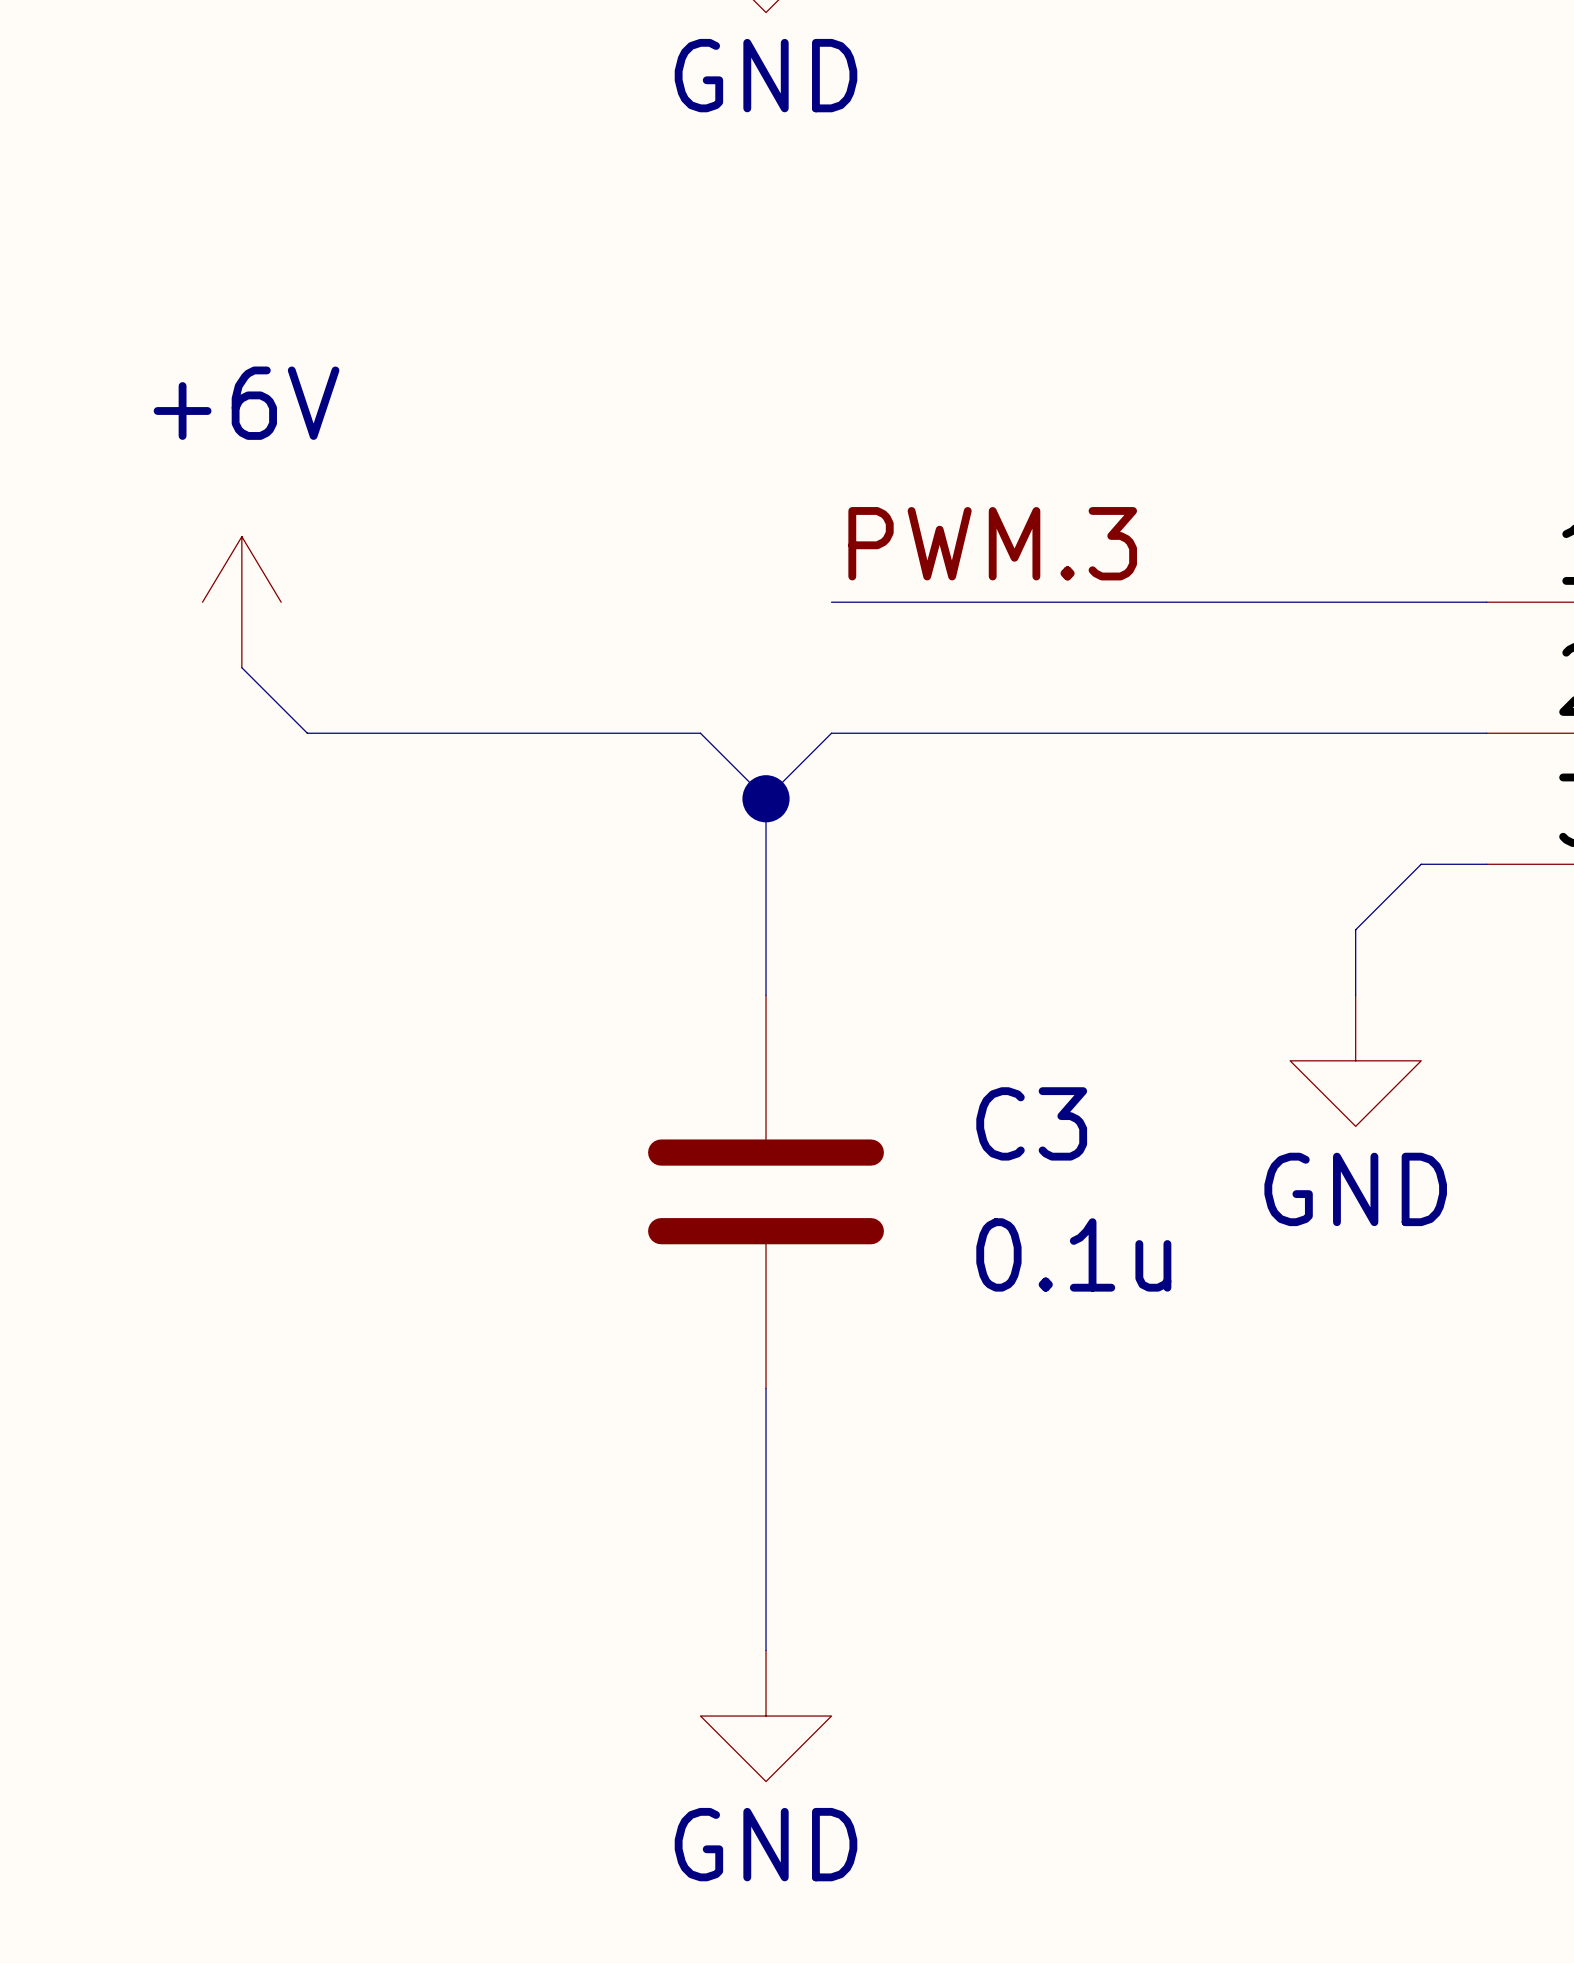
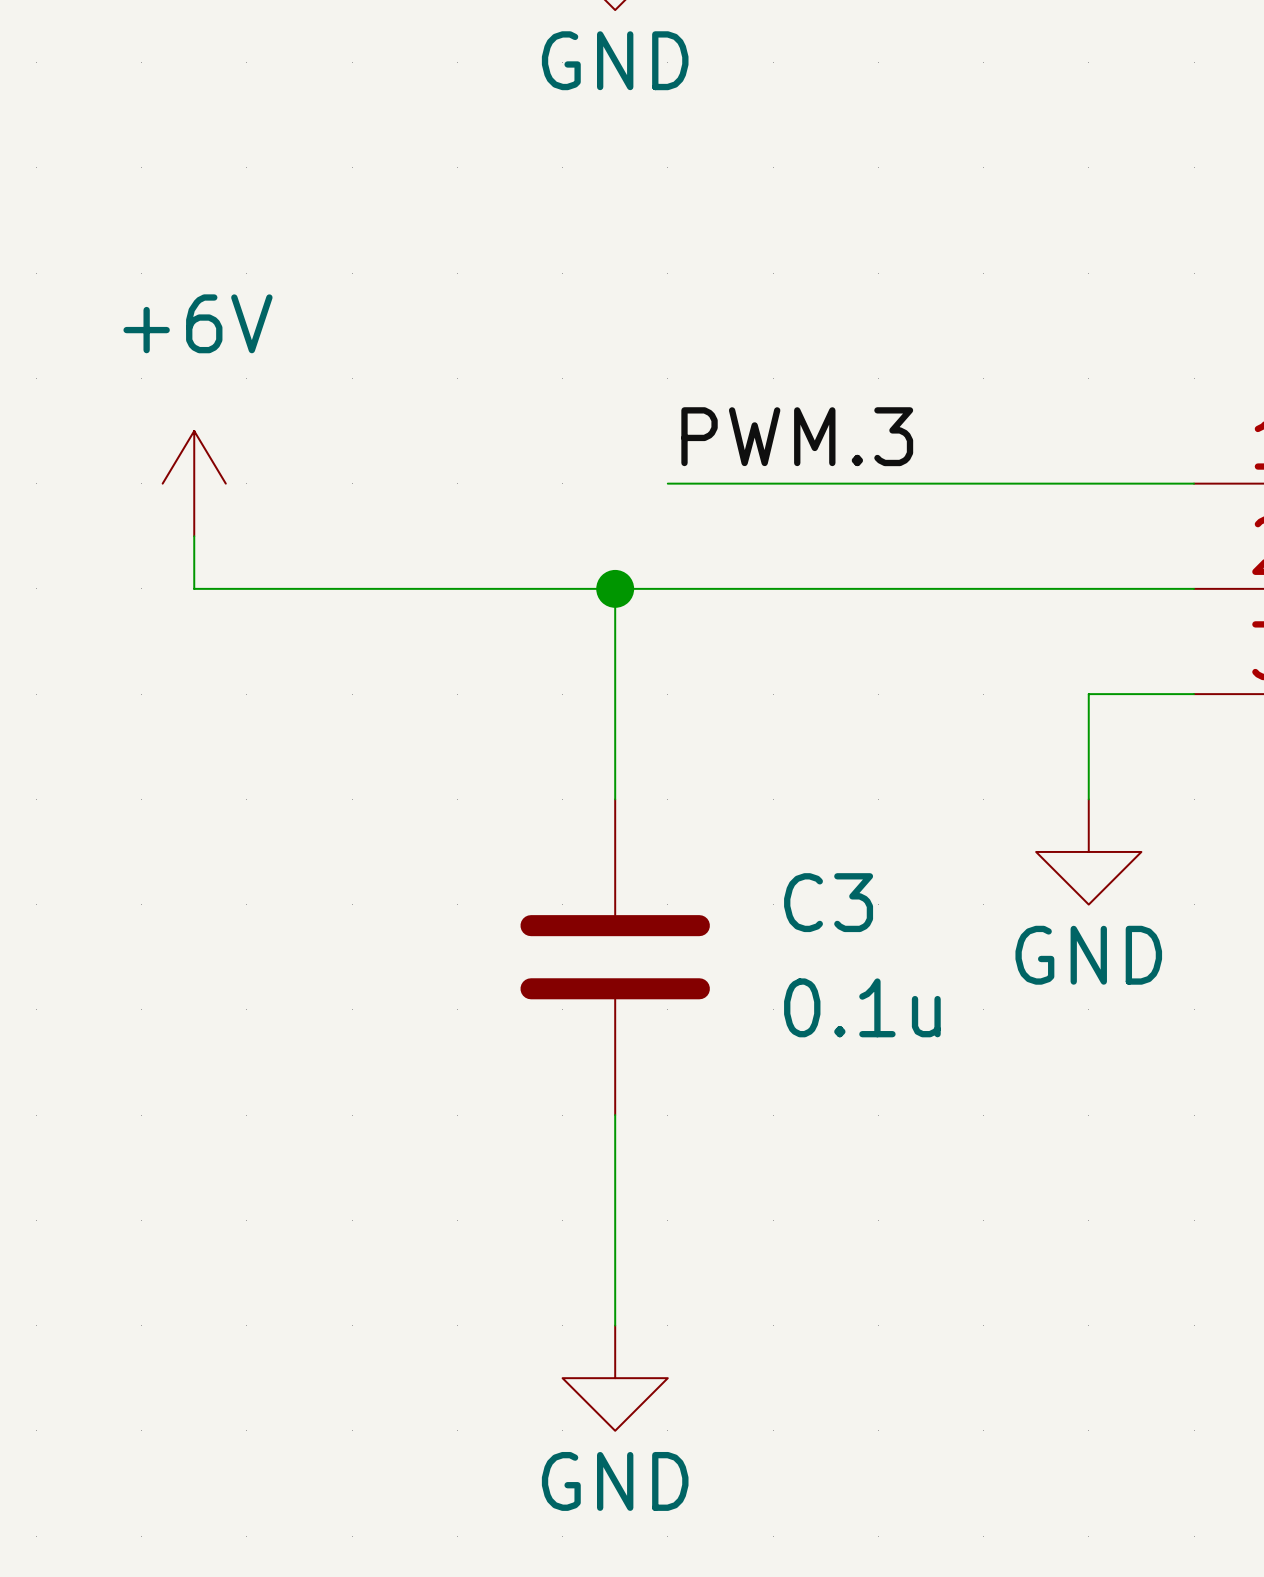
wire: (241, 667) (307, 733) -> (194, 536) (194, 588) (246, 588)
wire: (700, 733) (766, 798) (831, 733) -> (562, 588) (667, 588)
wire: none -> (615, 588) (615, 641)
junction position: (766, 798) -> (615, 588)
wire: (1421, 864) (1355, 929) -> (1141, 694) (1088, 694) (1088, 746)

